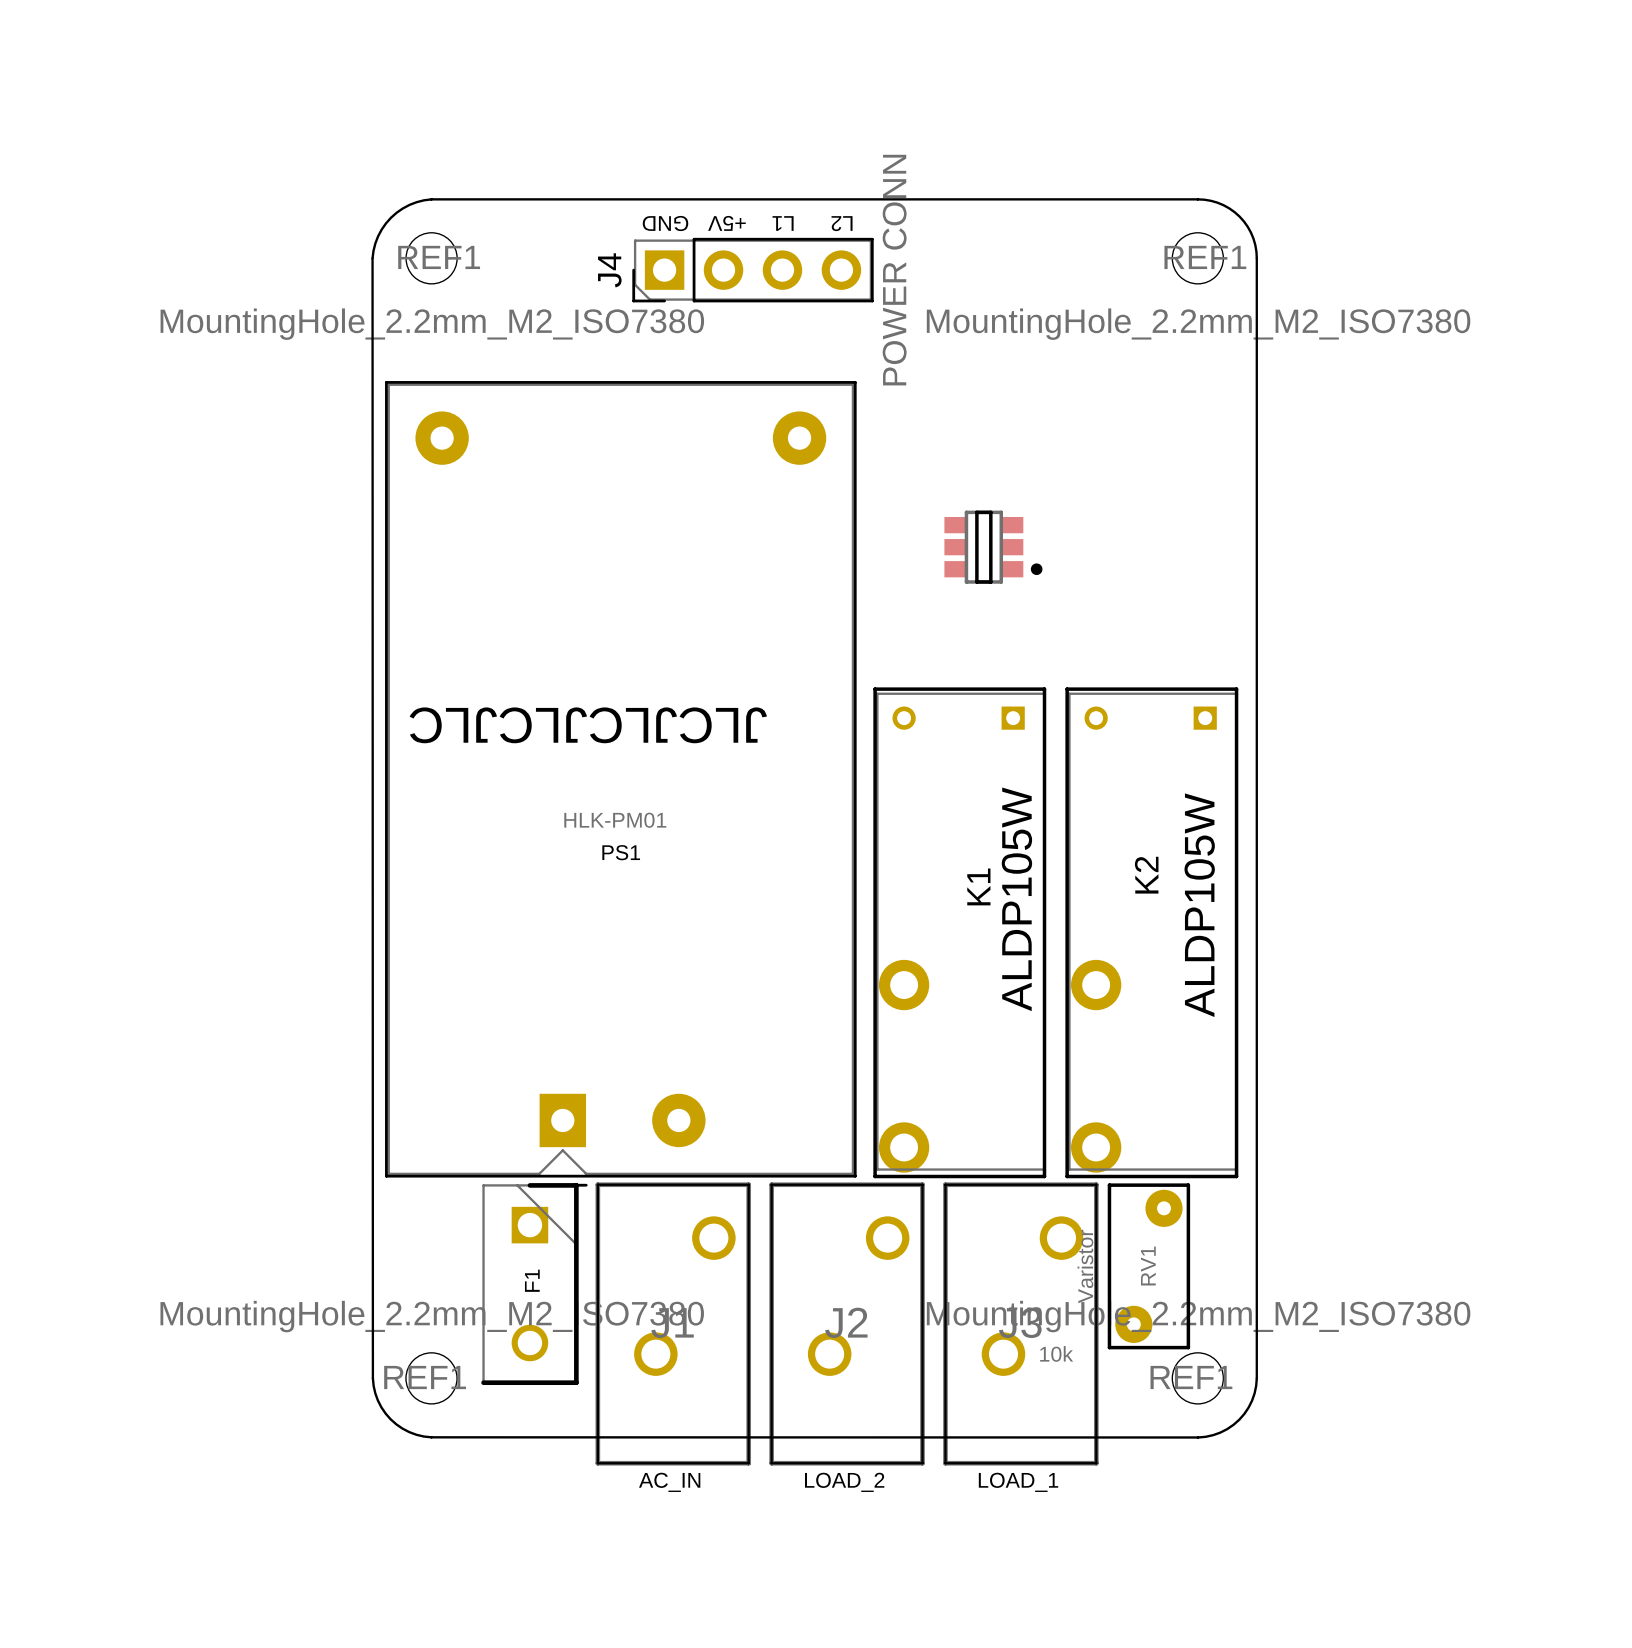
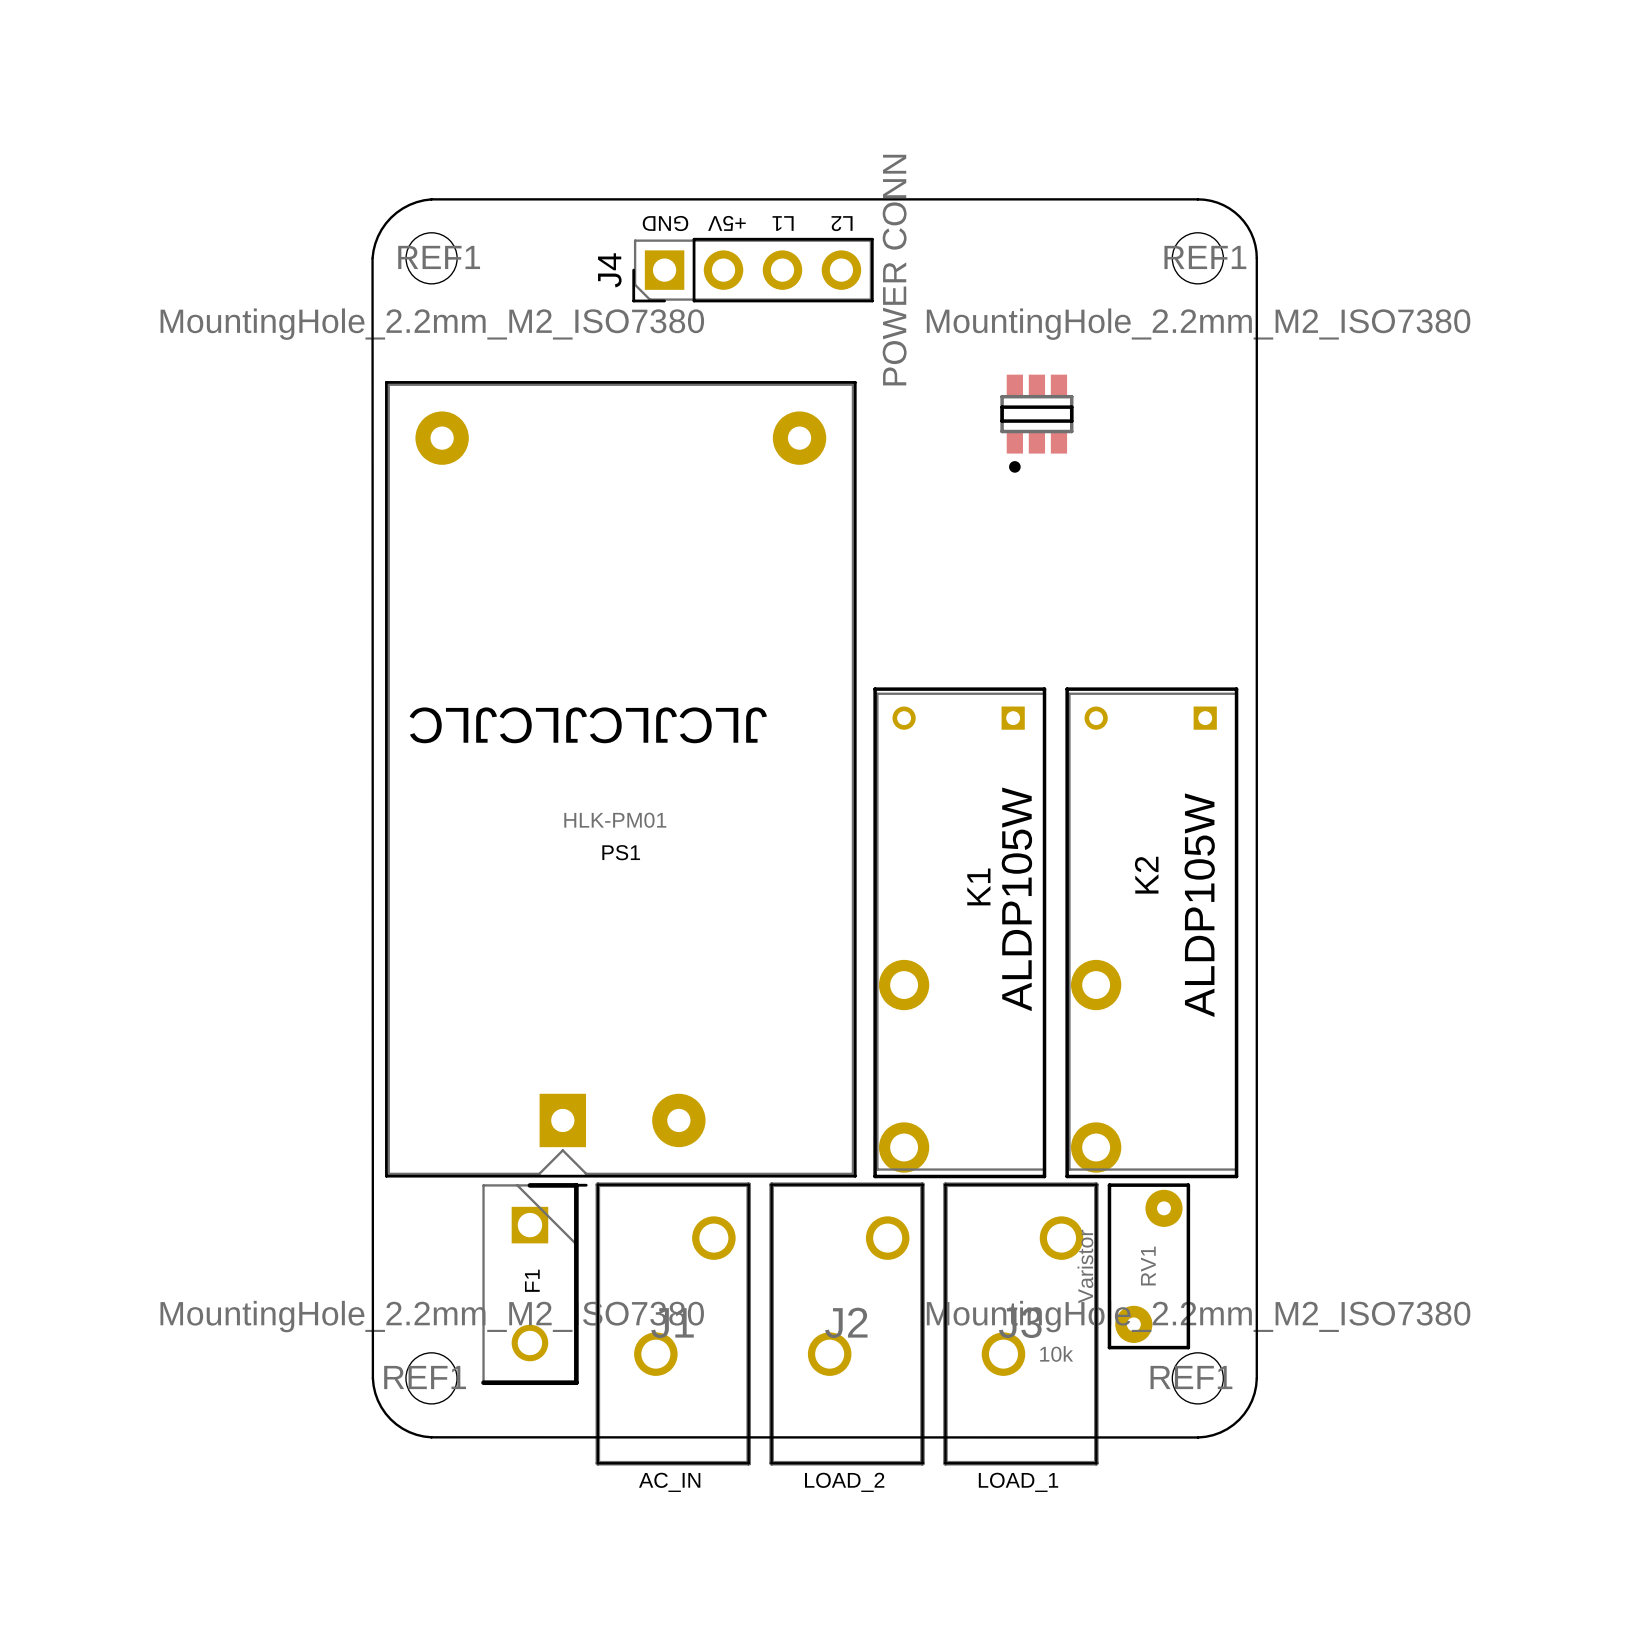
part rotation: 0° (993, 547) -> 90° clockwise (1036, 423)
part position: (993, 547) -> (1036, 423)

